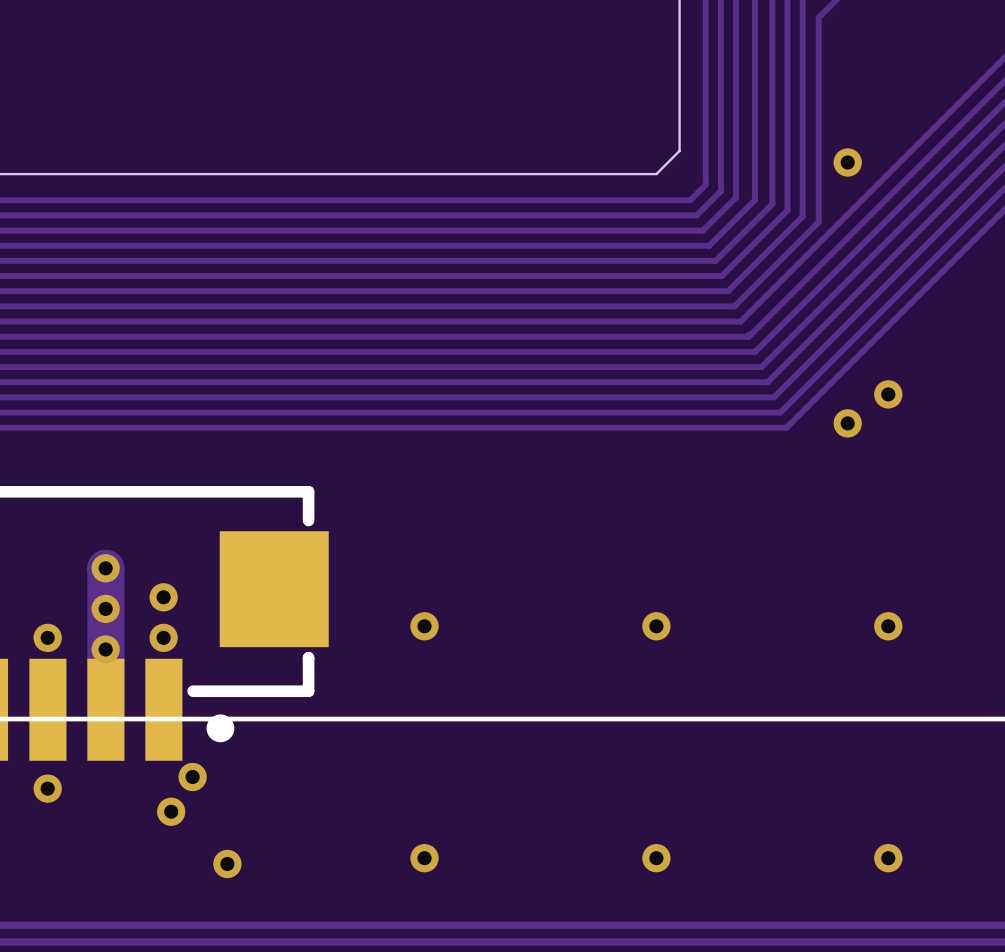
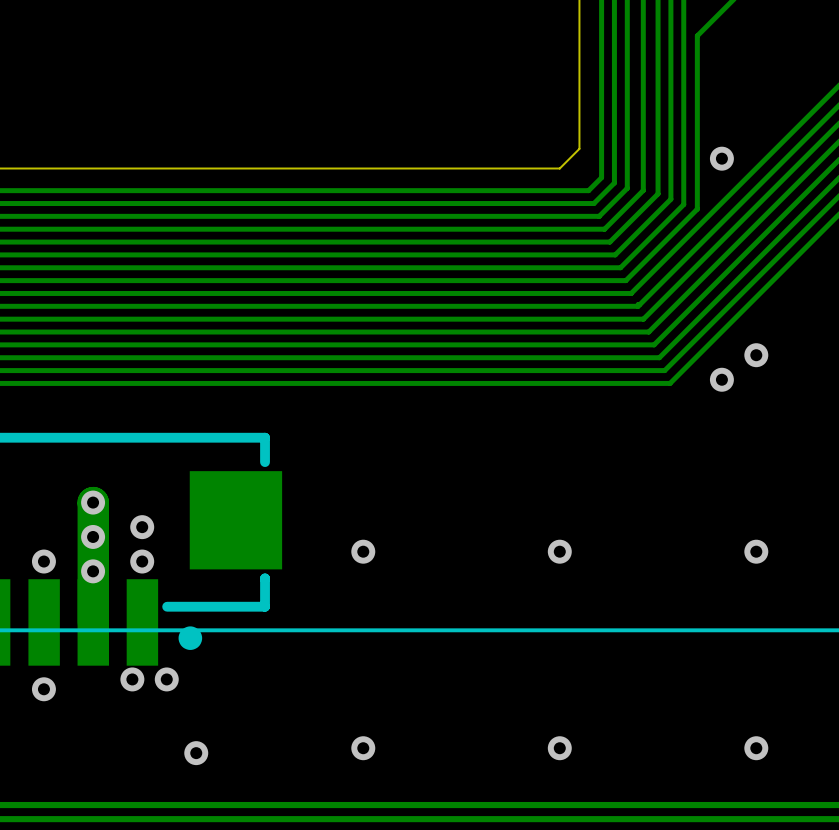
via position: (171, 811) -> (132, 679)

